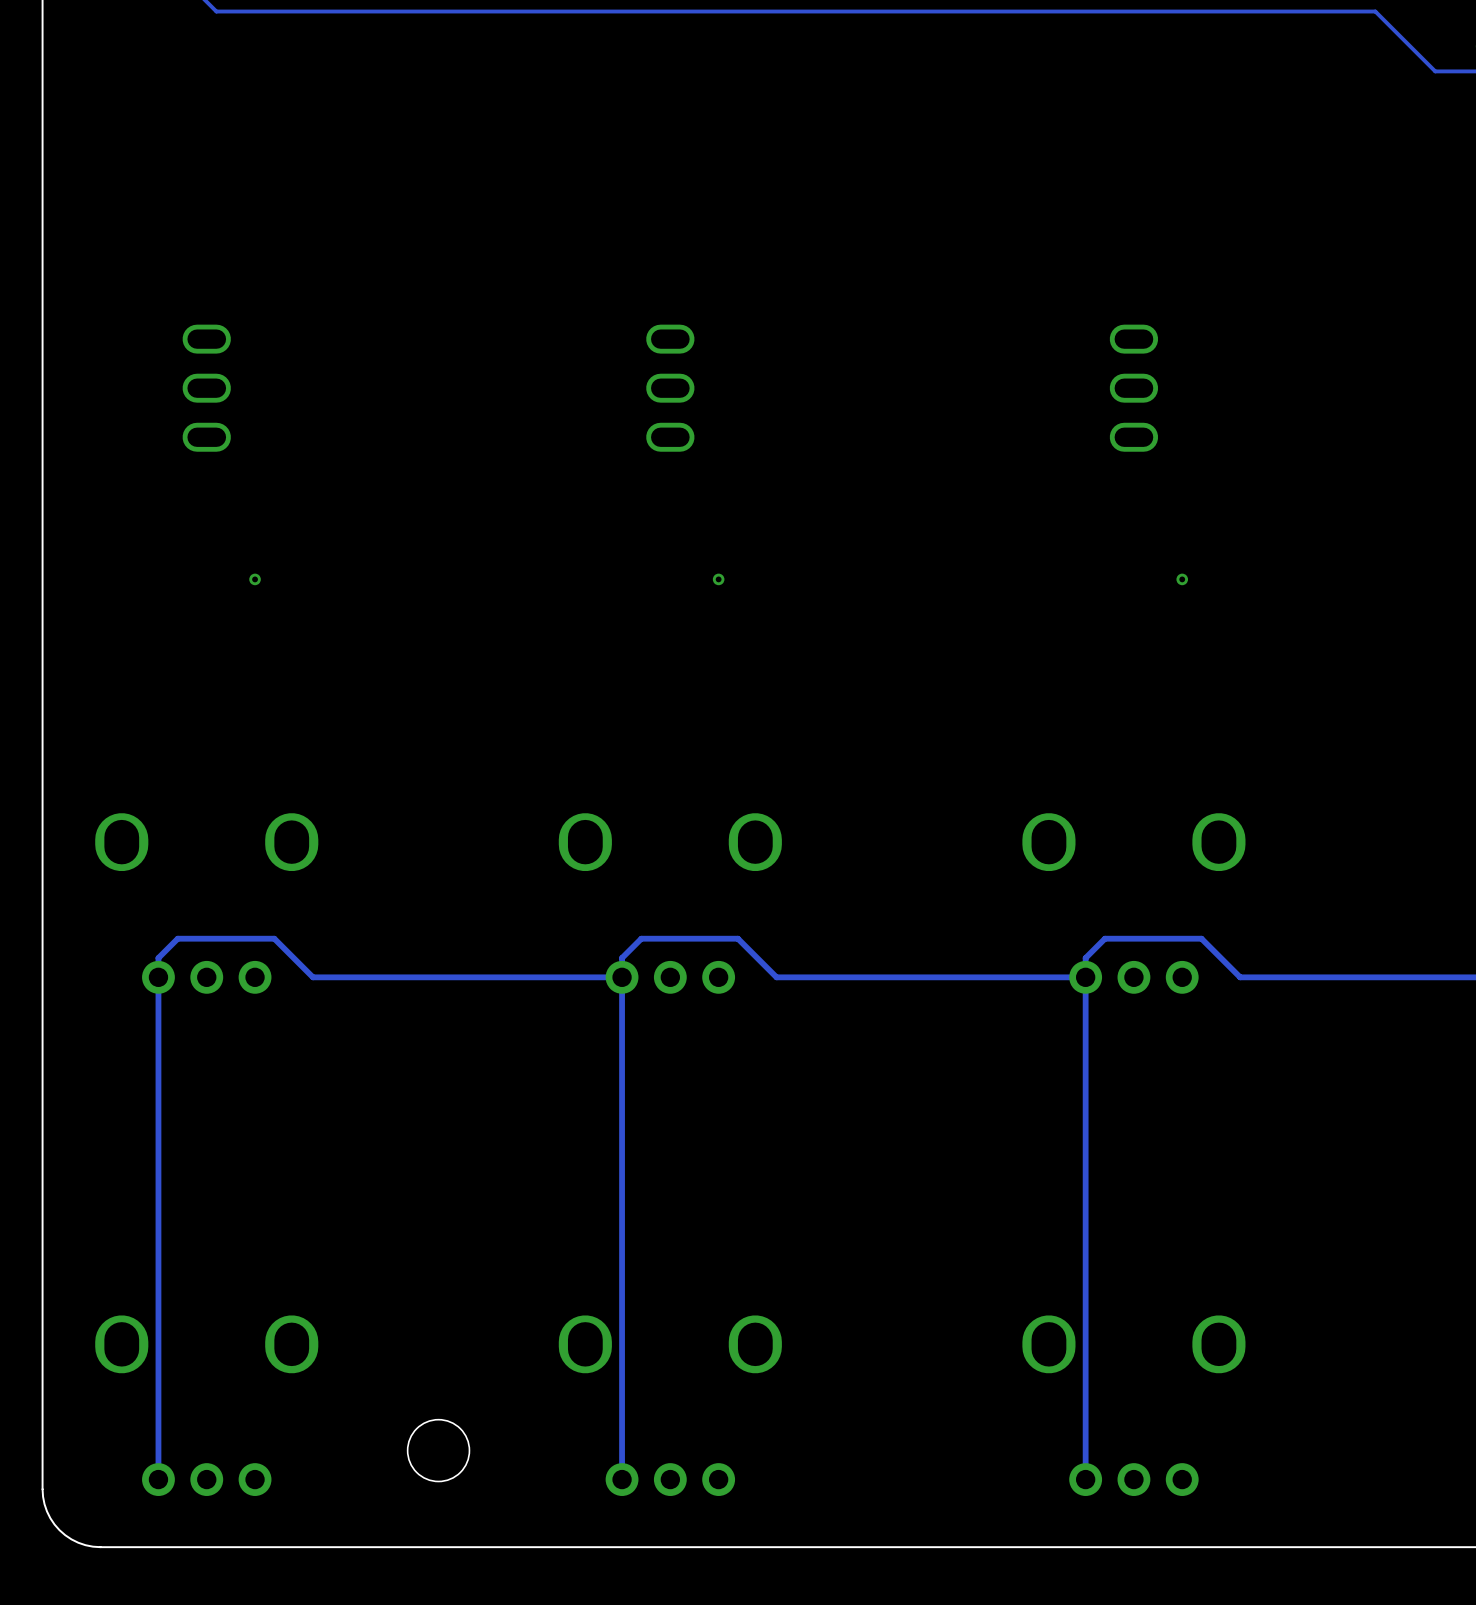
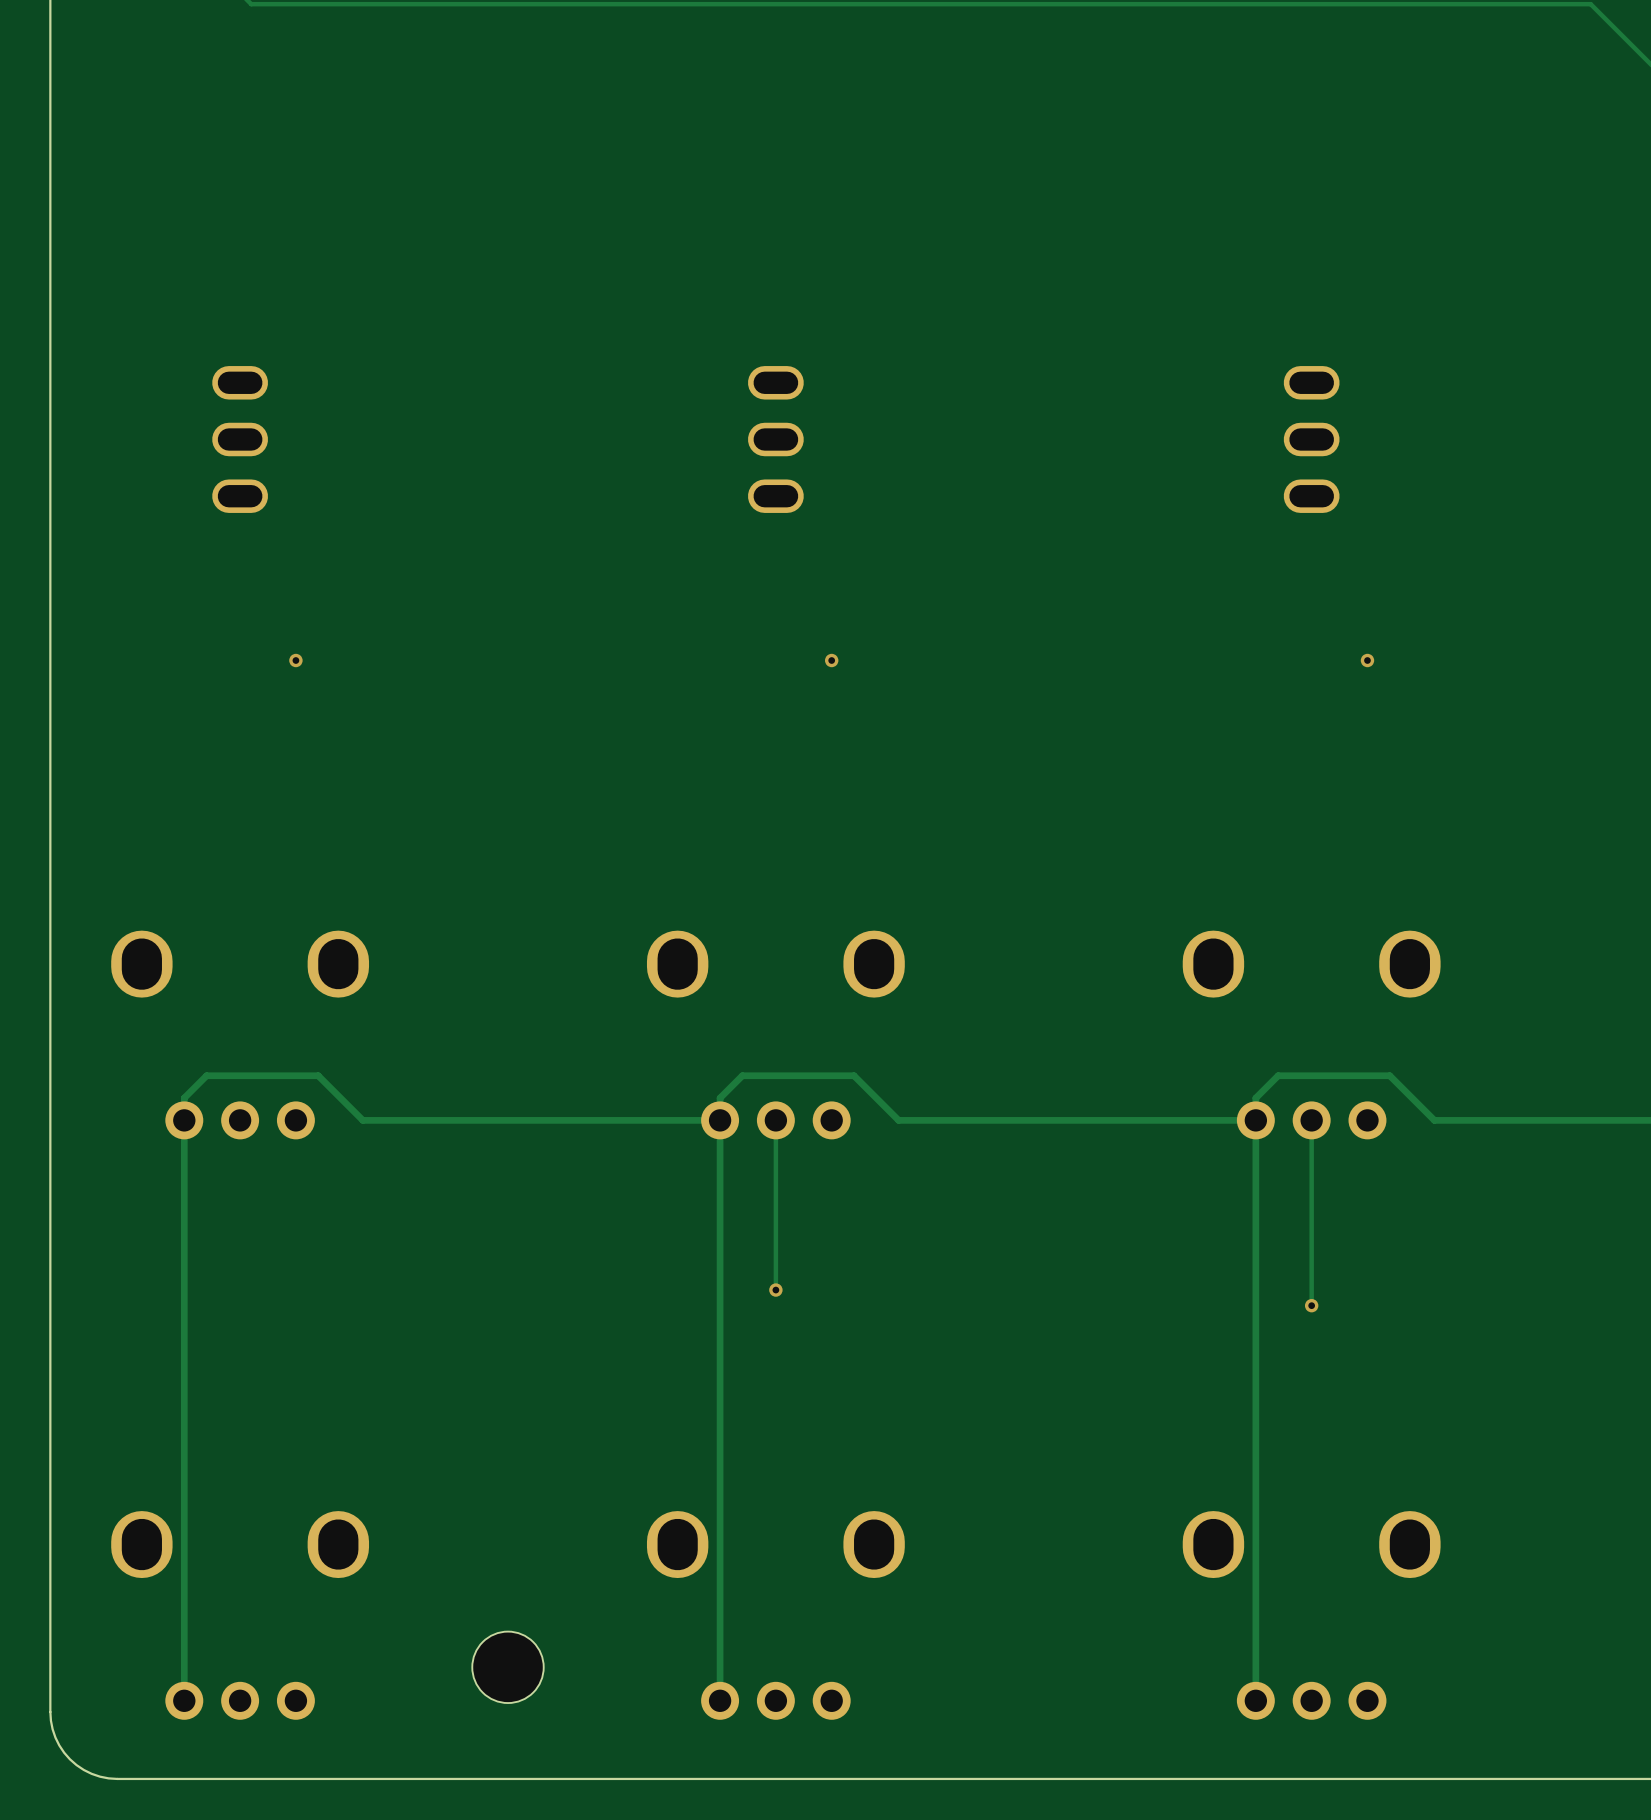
track: none -> (775, 1120) (775, 1290)
track: none -> (1311, 1120) (1311, 1305)
via: none -> (775, 1290)
via: none -> (1311, 1305)

